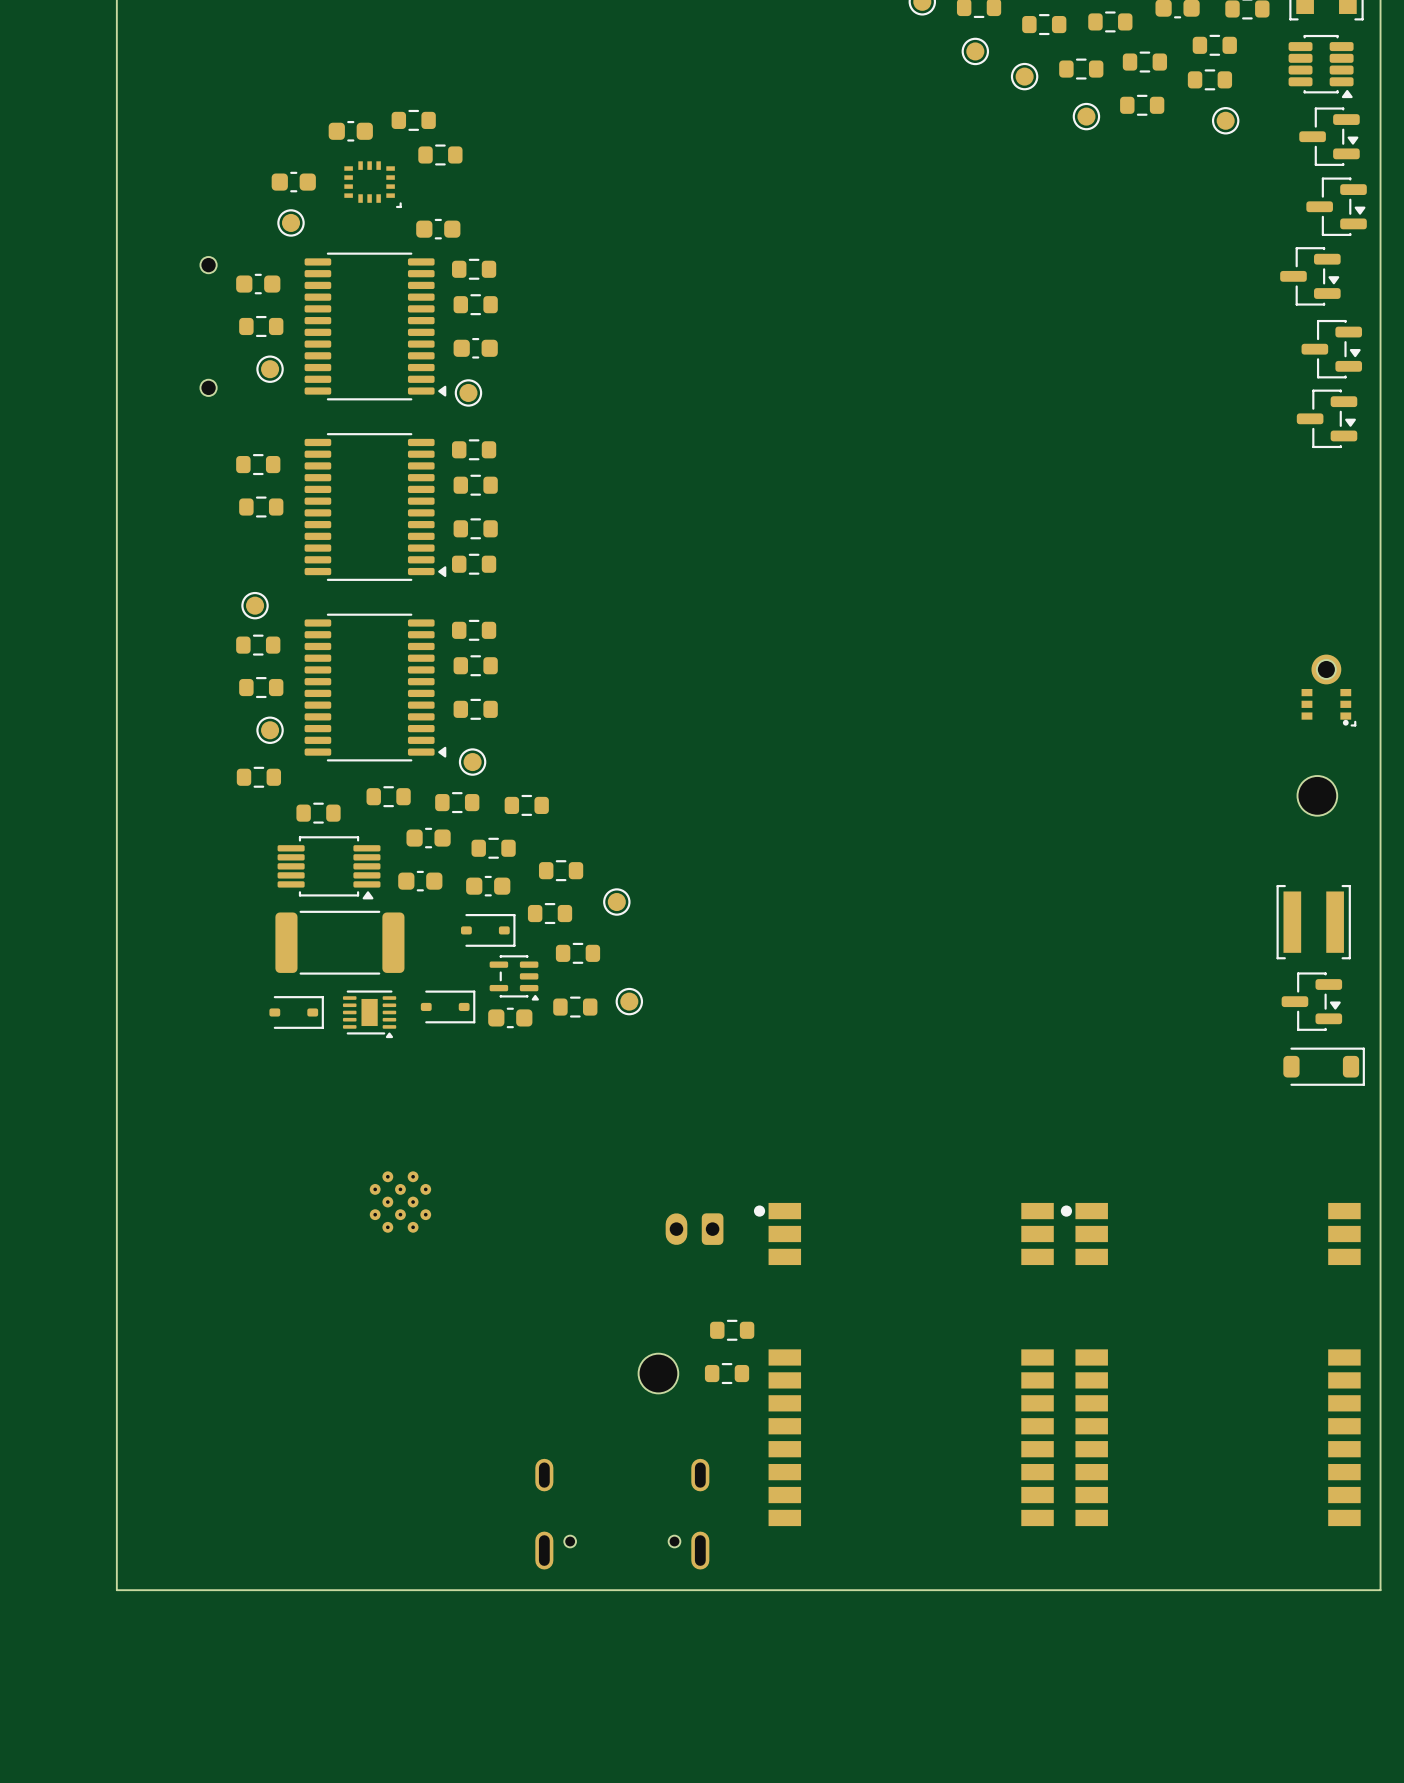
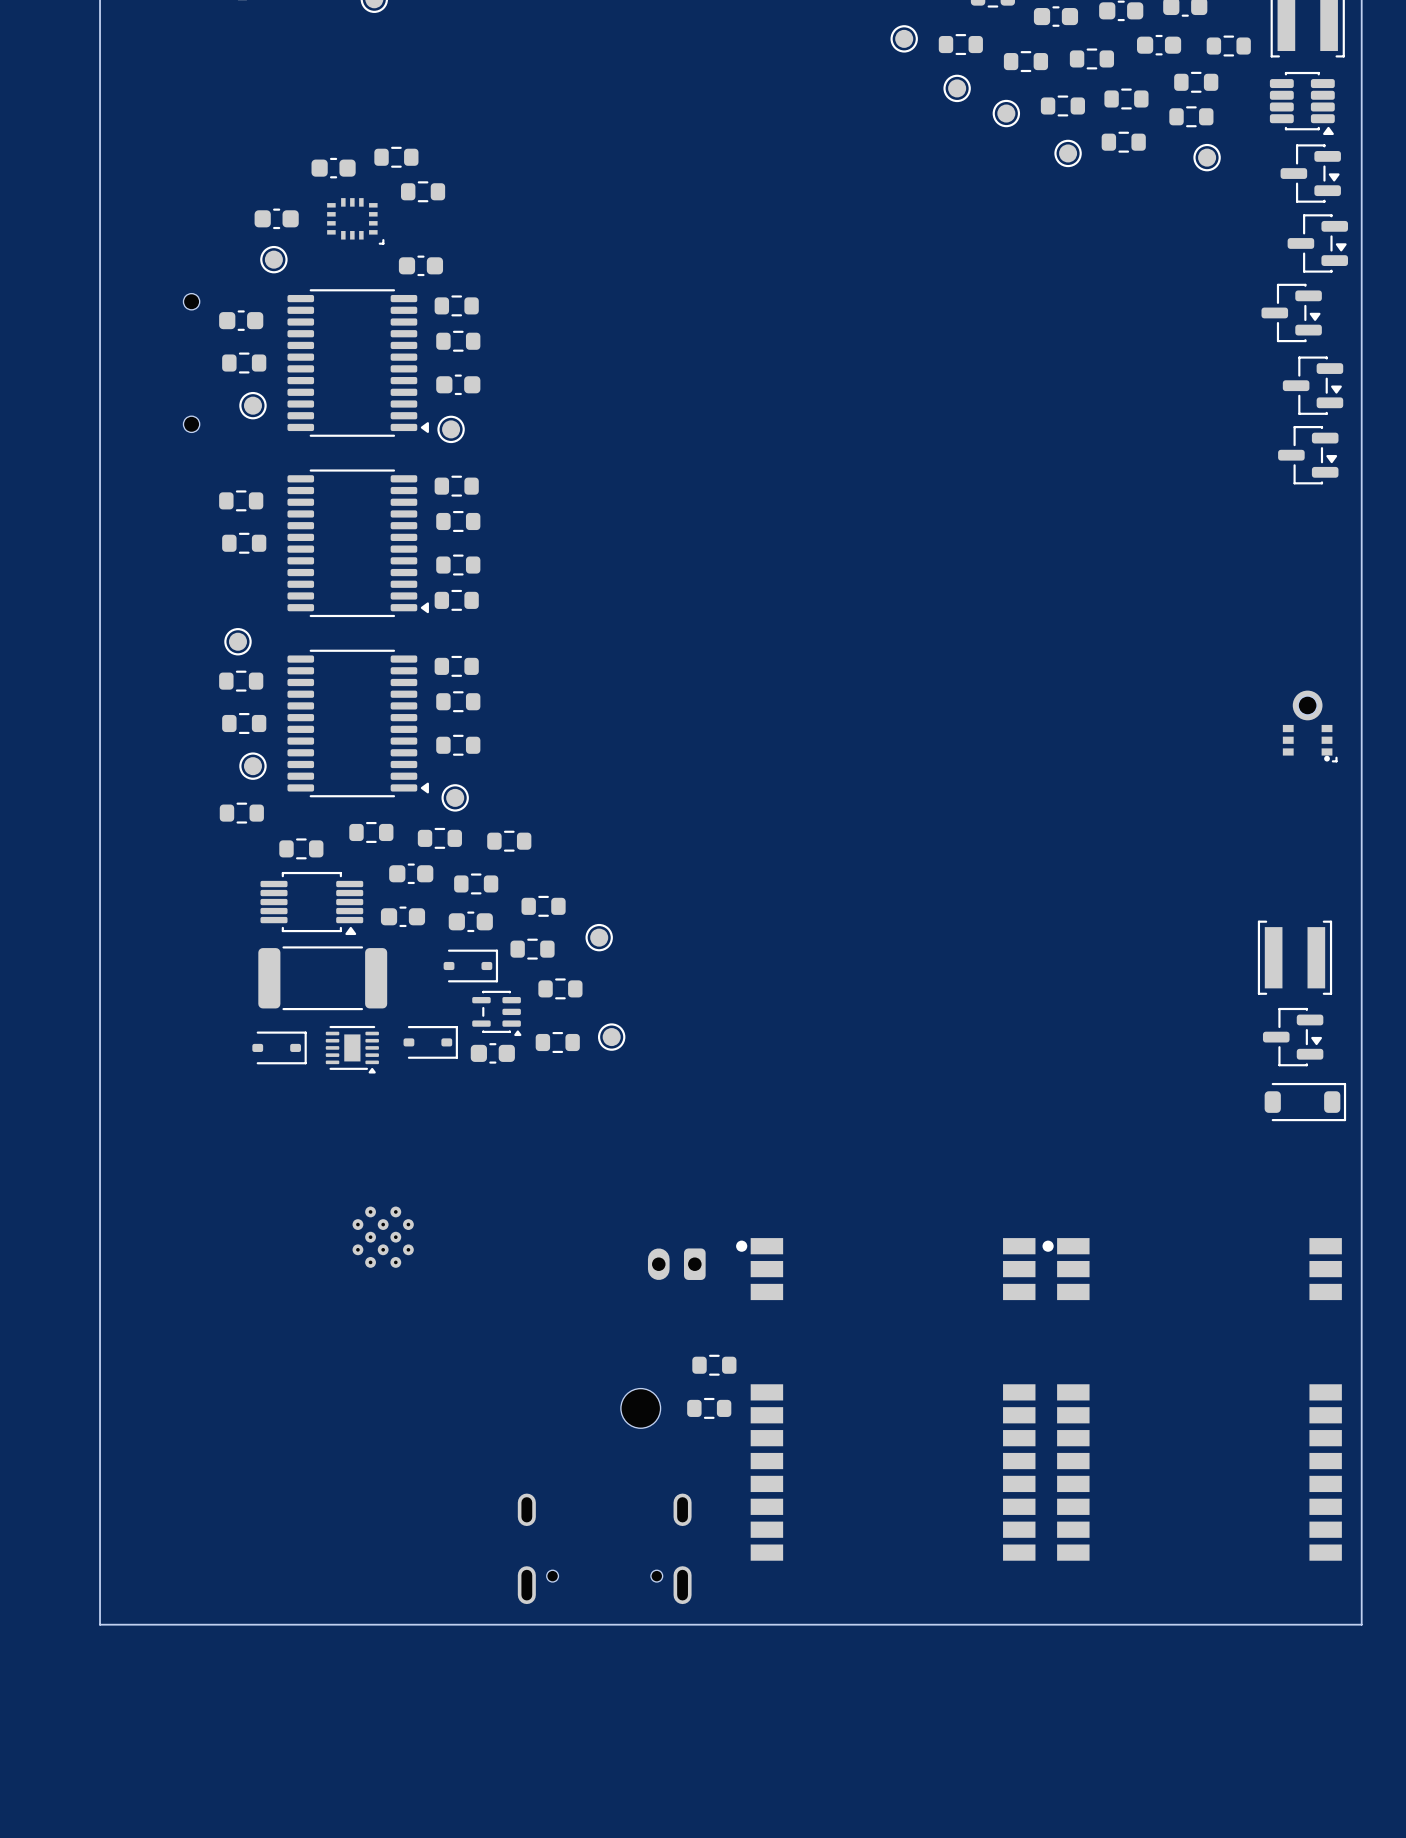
part: (1317, 795) -> none

